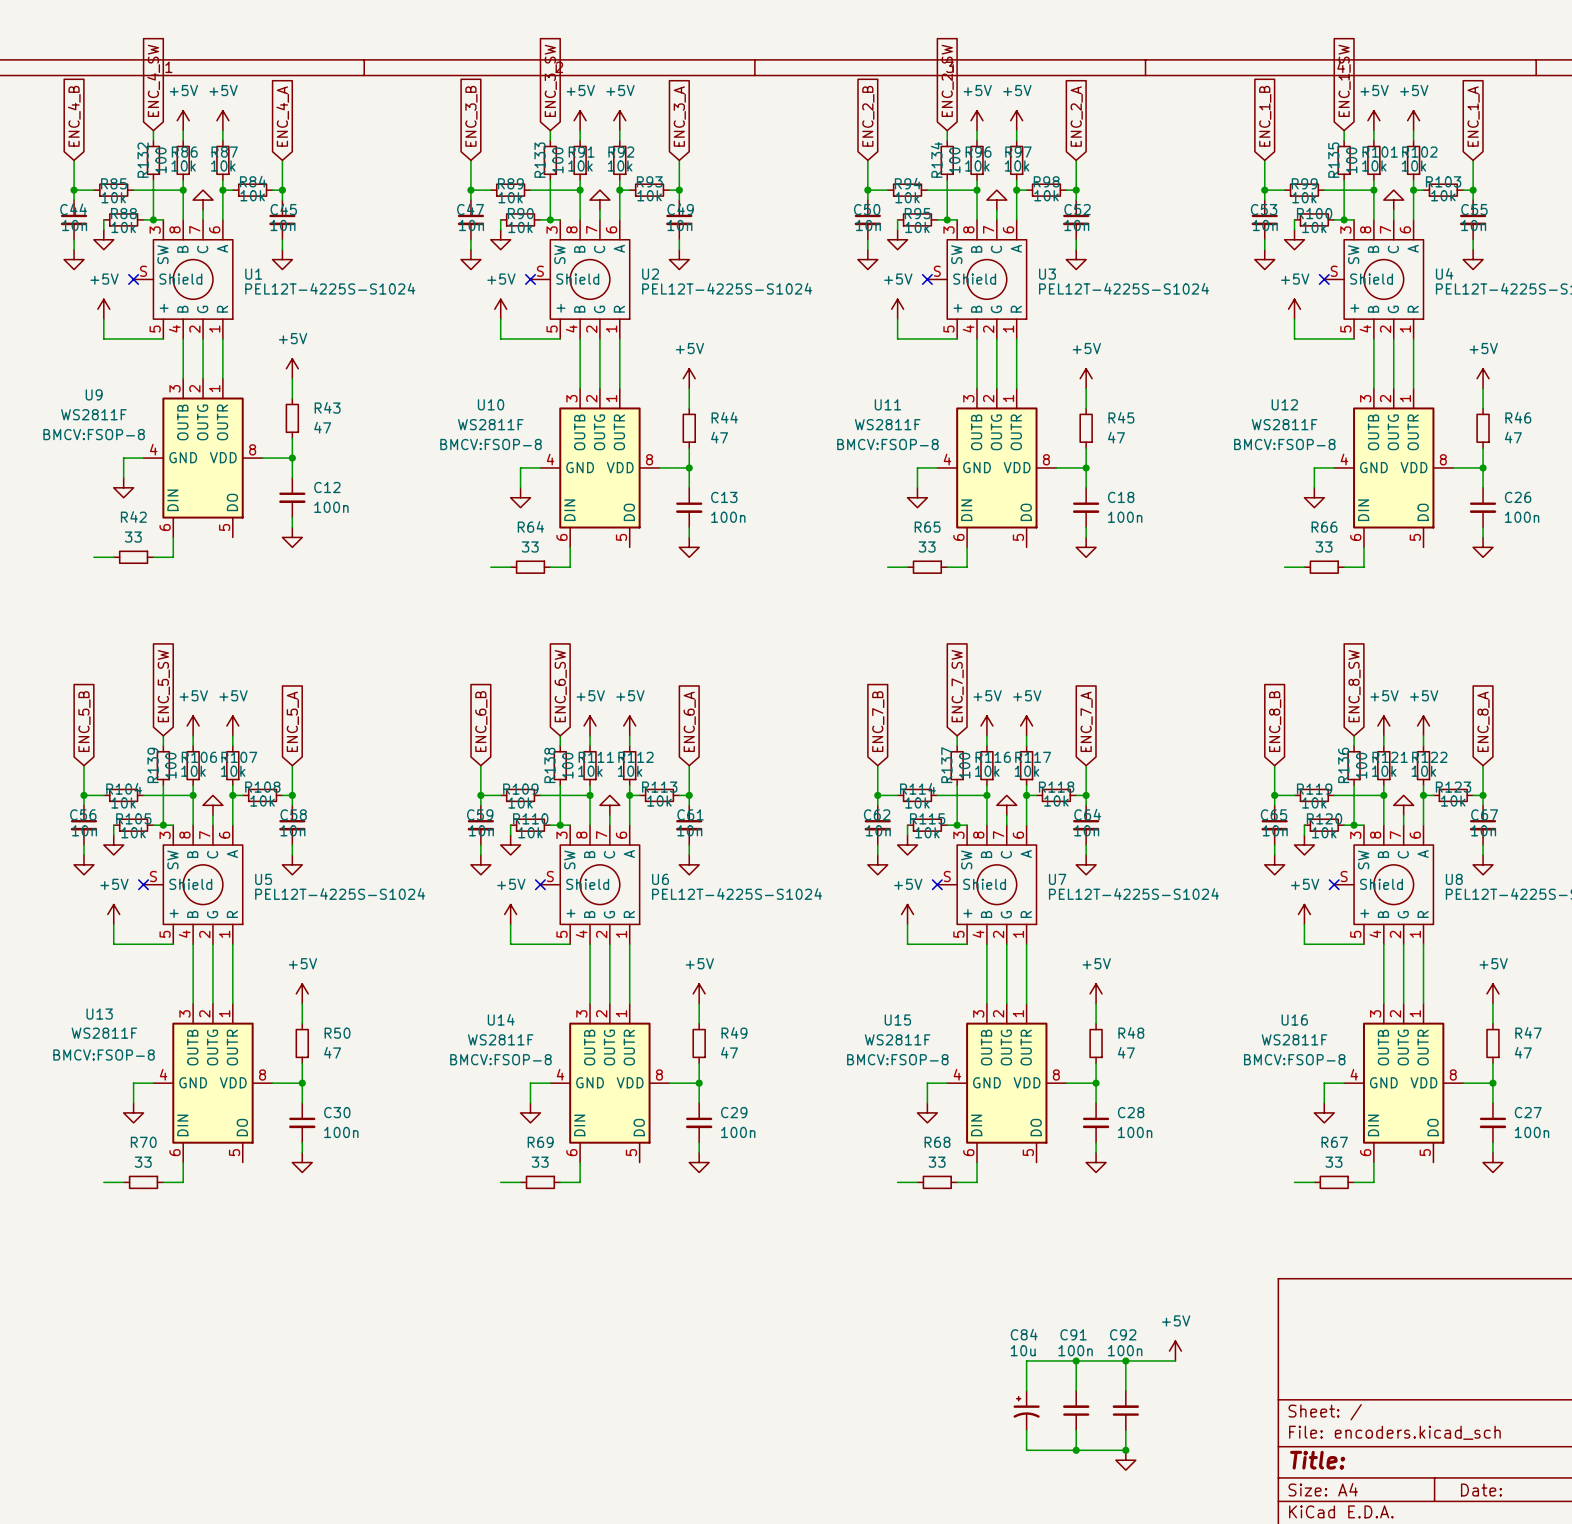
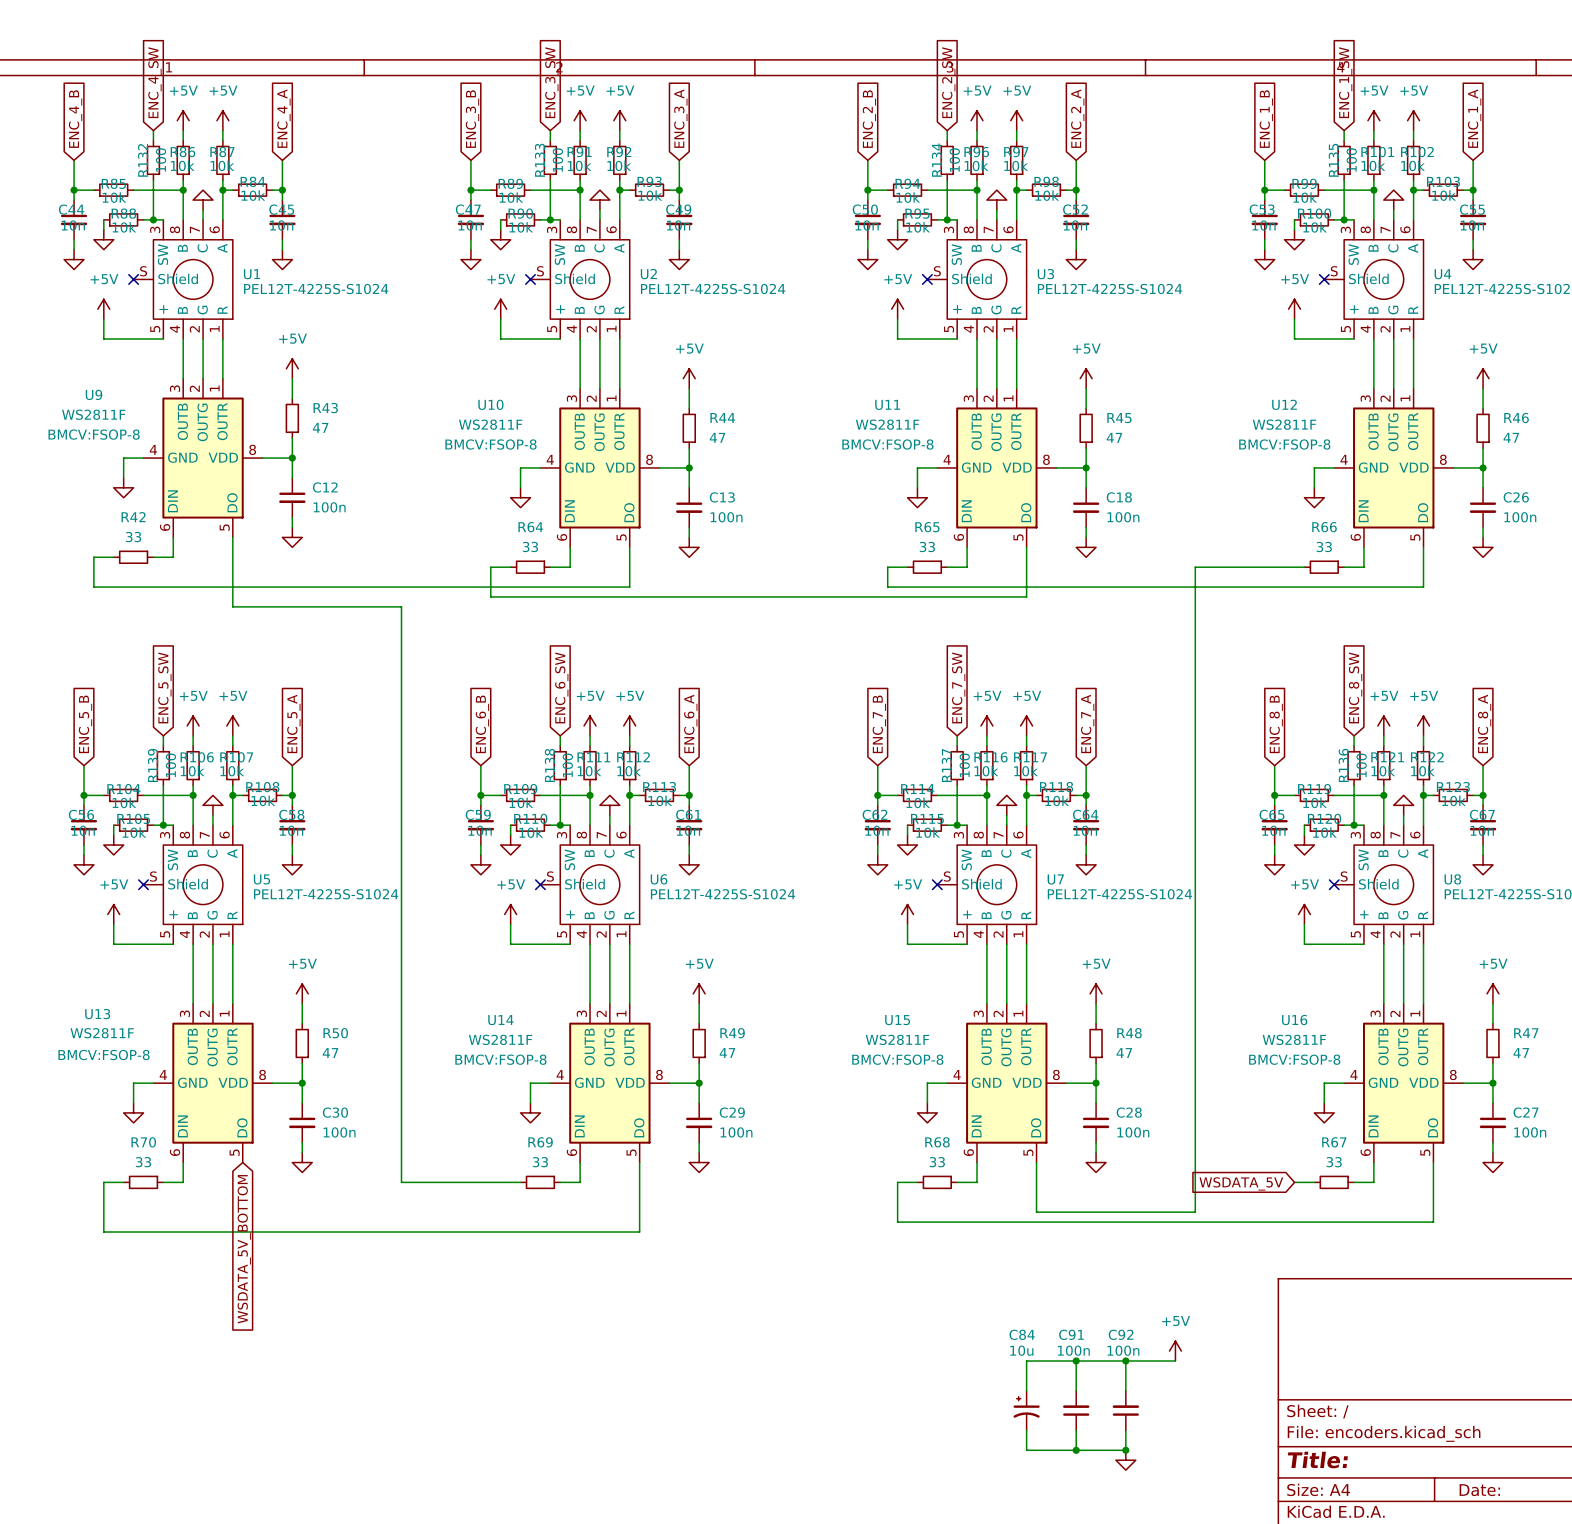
wire: none -> (232, 537) (232, 606) (401, 606) (401, 1182) (500, 1182)
wire: none -> (629, 547) (629, 587) (93, 587) (93, 557)
wire: none -> (1026, 547) (1026, 596) (490, 596) (490, 567)
wire: none -> (1423, 547) (1423, 587) (887, 587) (887, 567)
wire: none -> (1284, 567) (1195, 567) (1195, 1212) (1036, 1212) (1036, 1162)
wire: none -> (639, 1162) (639, 1232) (103, 1232) (103, 1182)
wire: none -> (1433, 1162) (1433, 1222) (897, 1222) (897, 1182)
global label: none -> WSDATA_5V (1241, 1183)
global label: none -> WSDATA_5V_BOTTOM (244, 1249)

